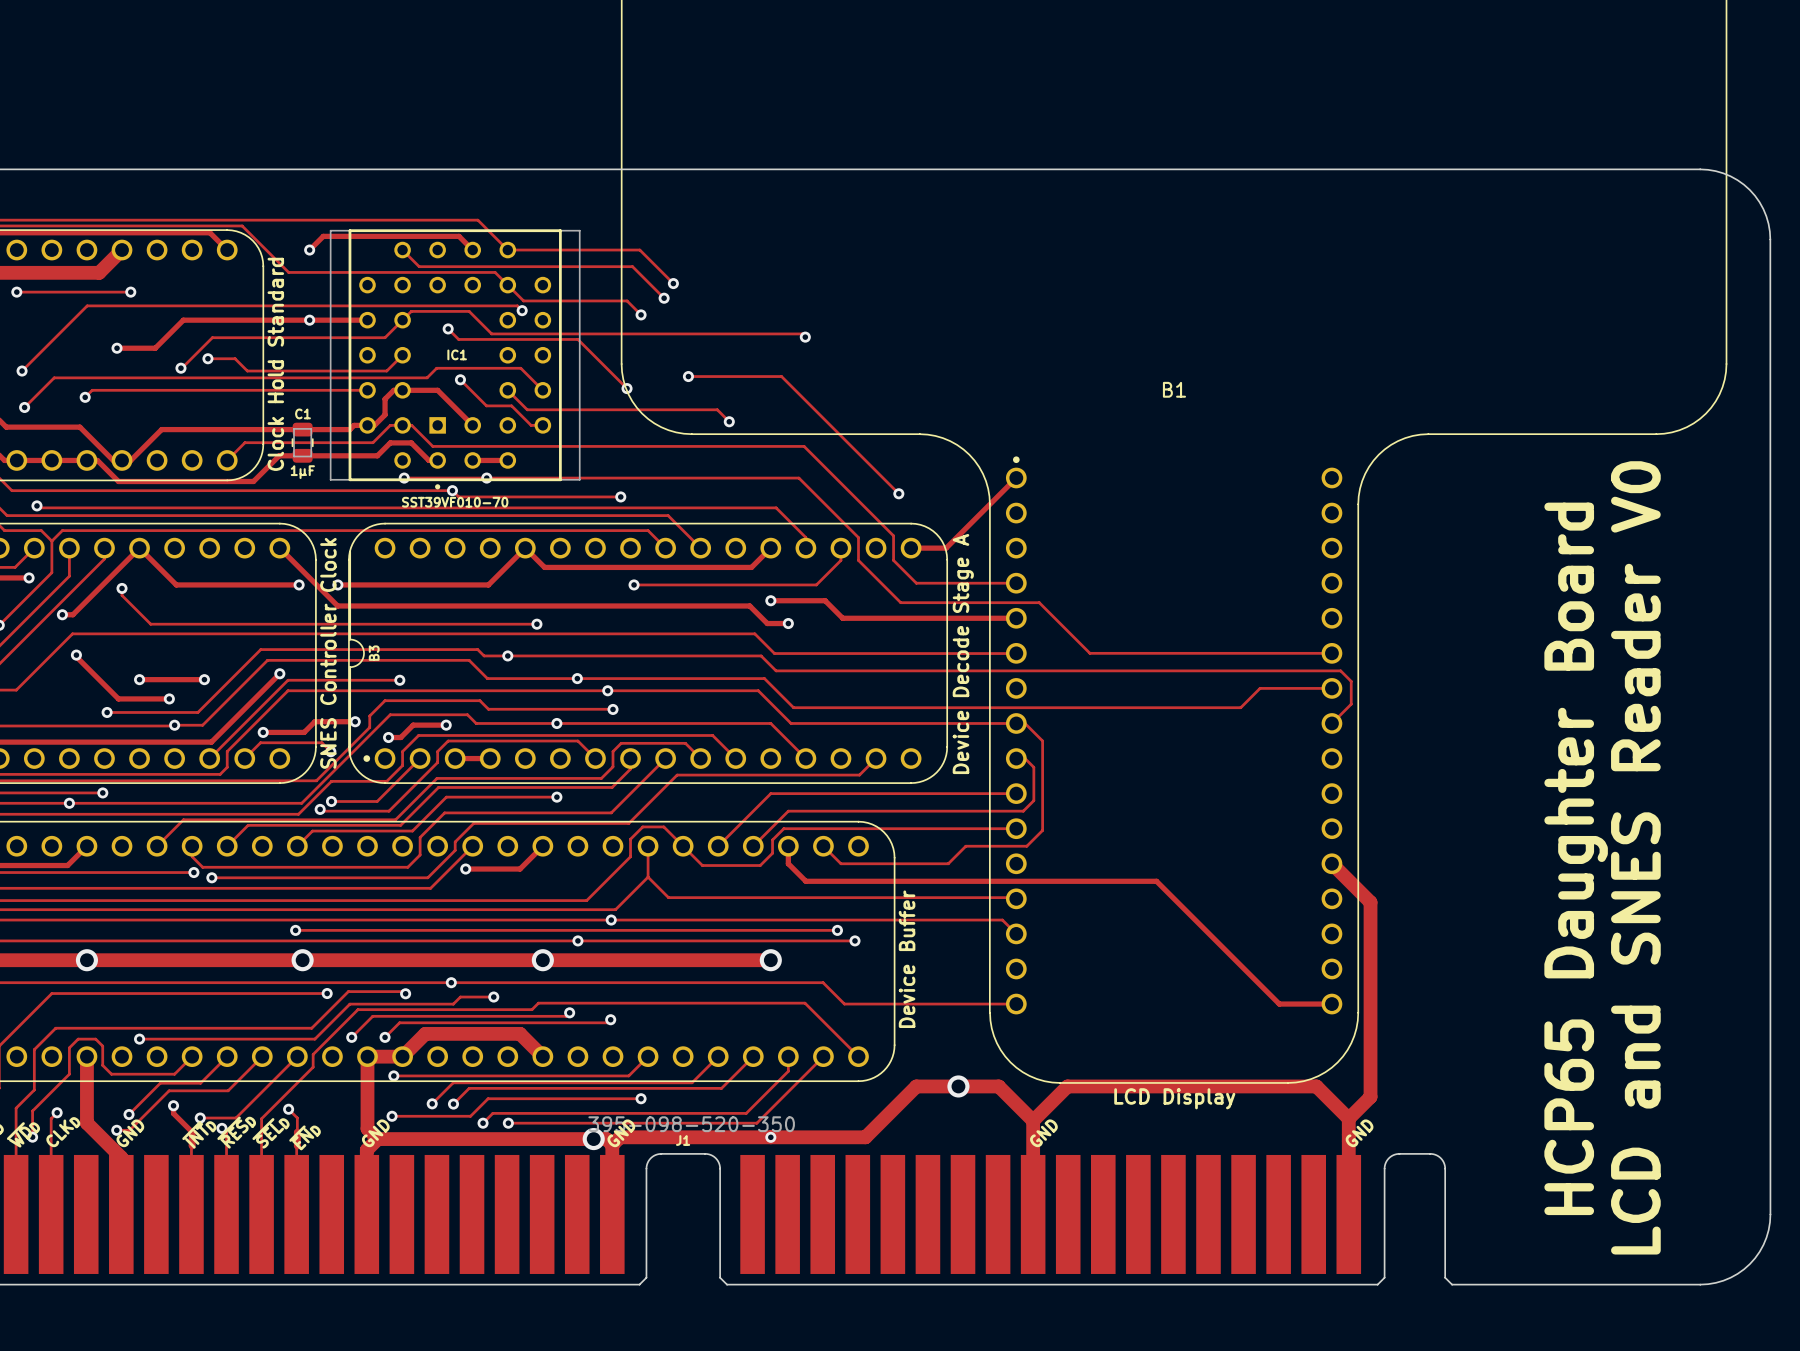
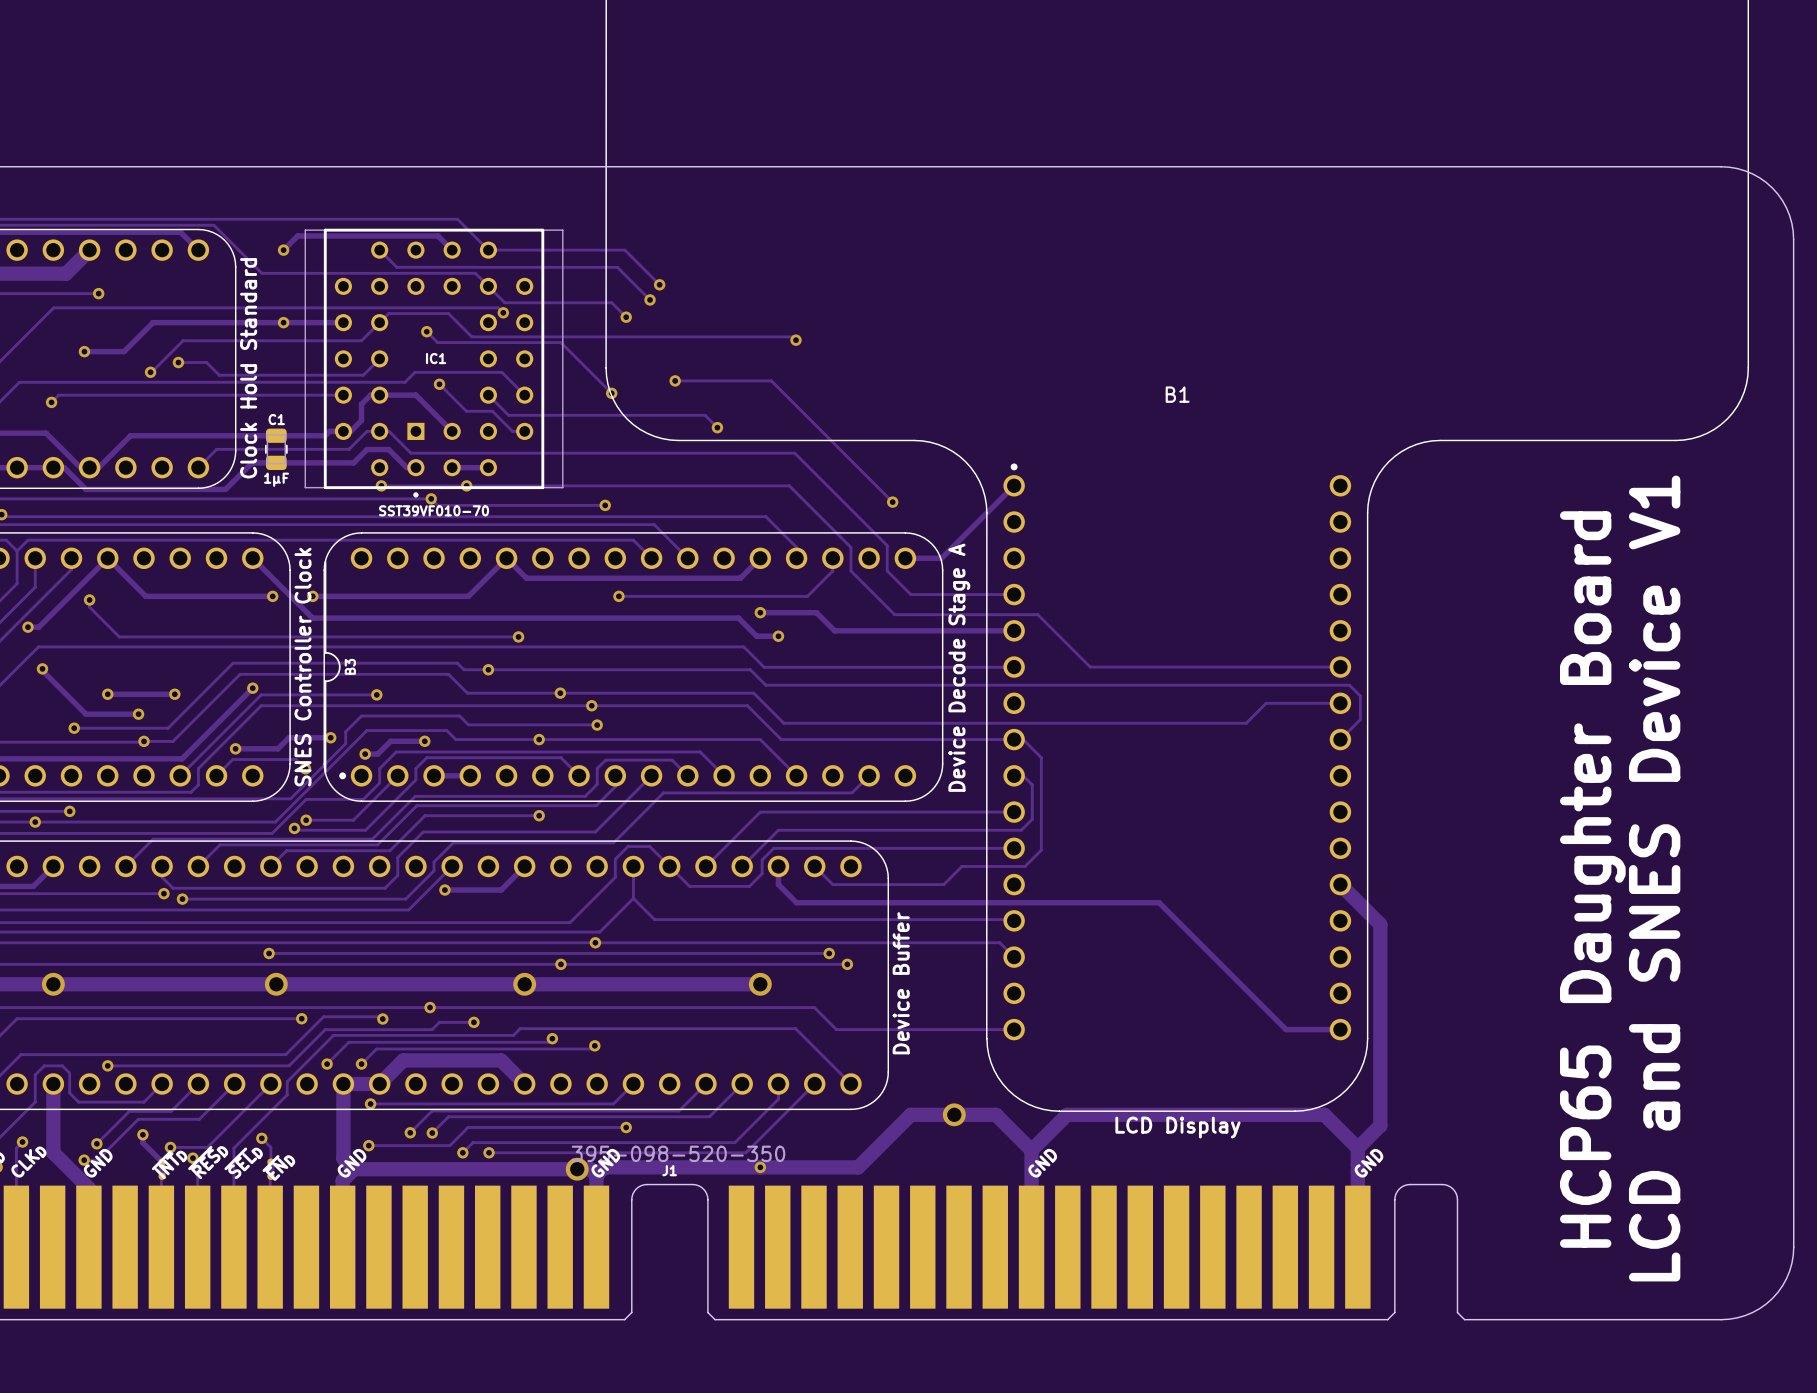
text: LCD and SNES Reader V0 (1635, 857) -> LCD and SNES Device V1 (1654, 878)

